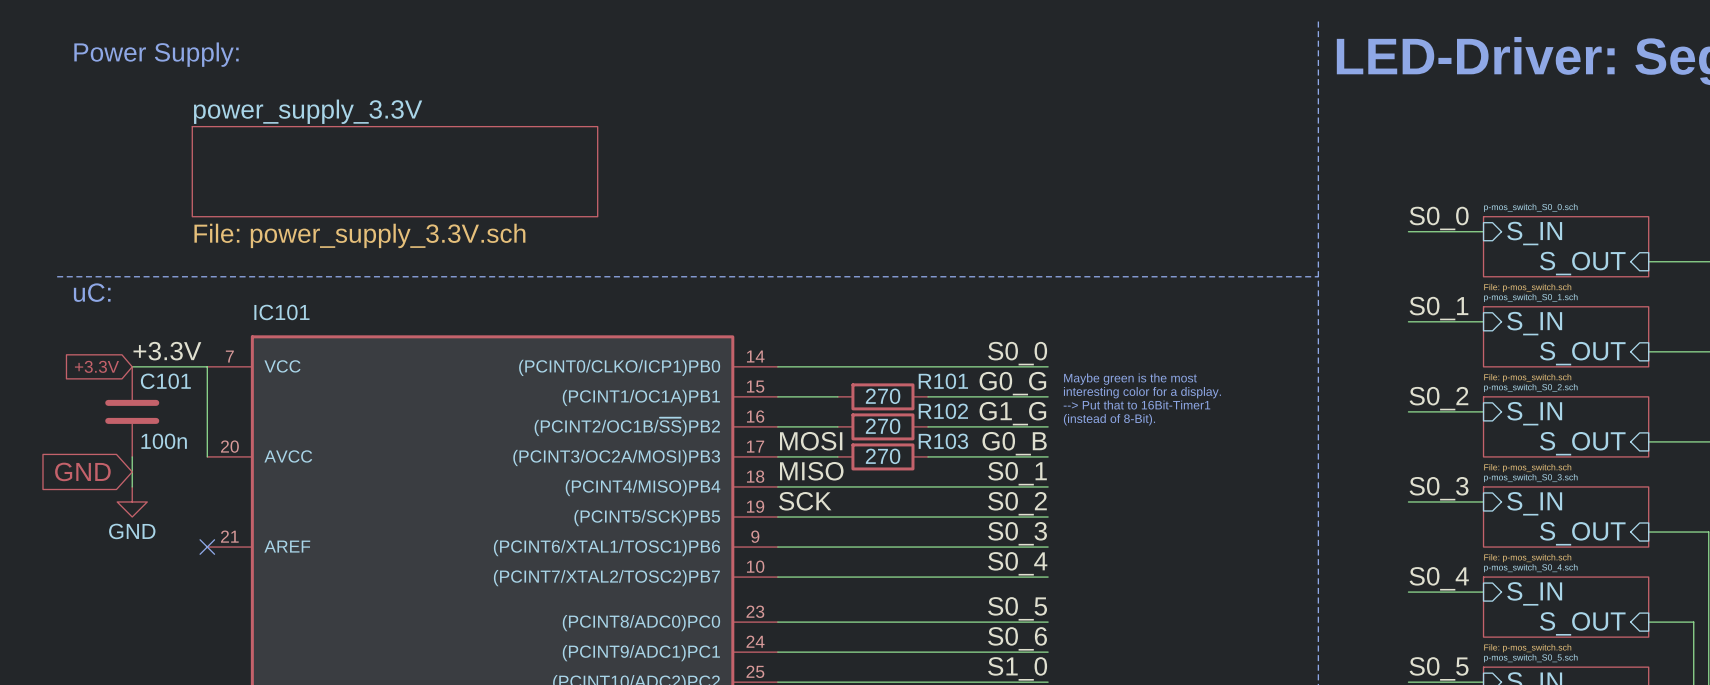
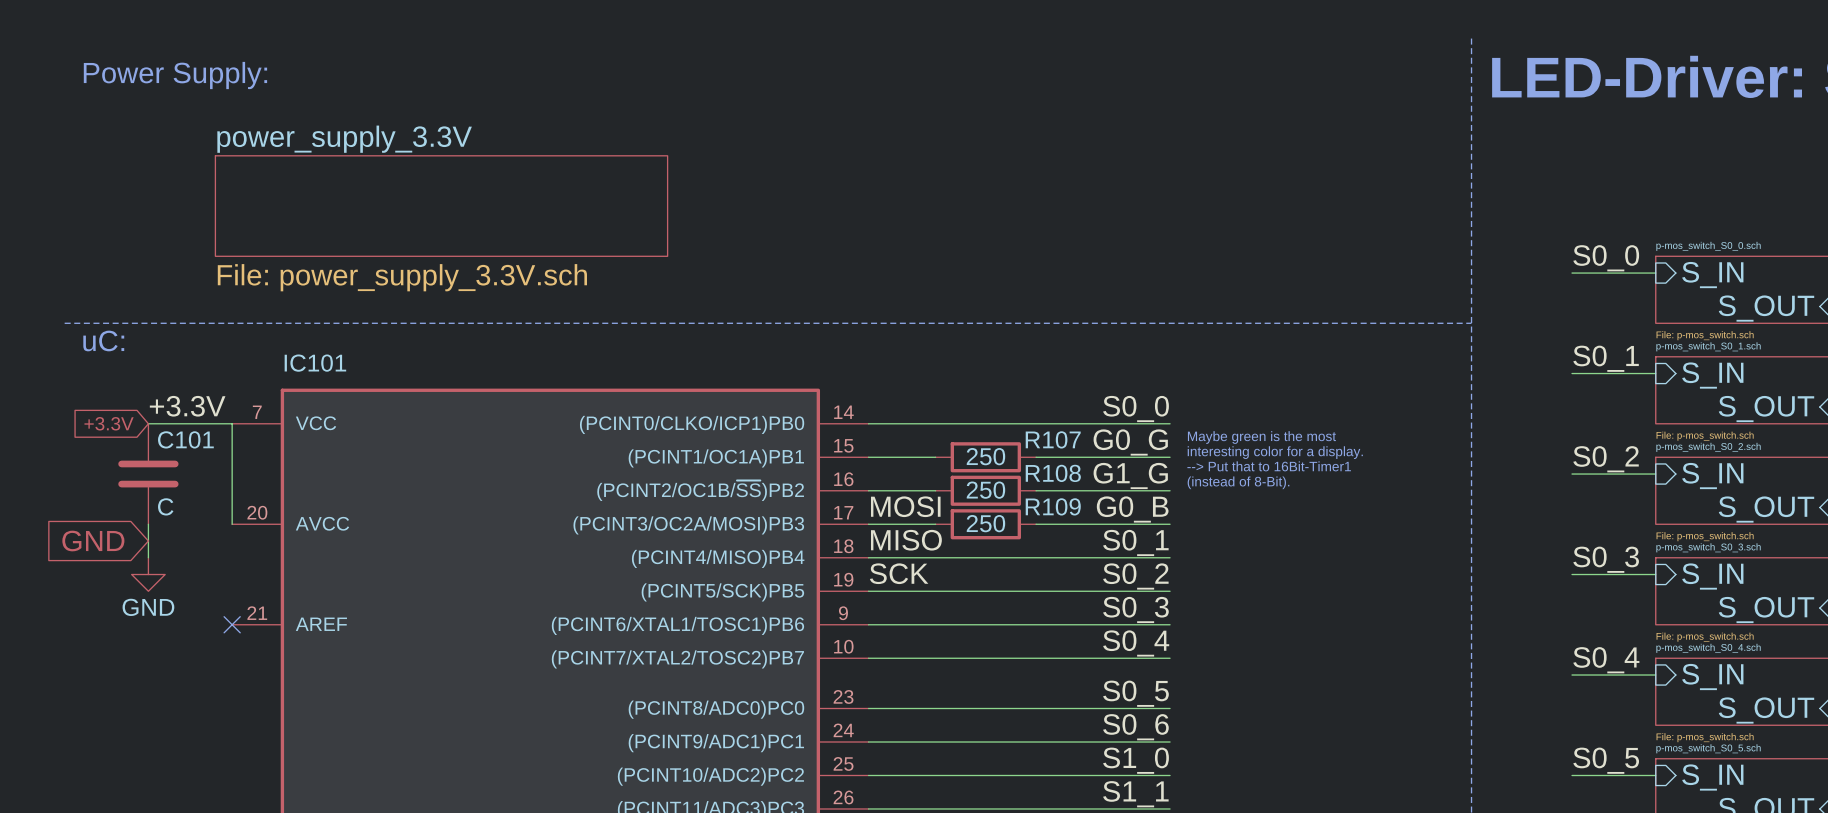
R101 name: R101 (943, 381) -> R107 (1053, 439)
R101 value: 270 (883, 396) -> 250 (985, 456)
R102 name: R102 (943, 411) -> R108 (1053, 473)
R102 value: 270 (883, 426) -> 250 (985, 490)
C101 value: 100n (164, 441) -> C (165, 506)
R103 name: R103 (943, 441) -> R109 (1053, 506)
R103 value: 270 (883, 456) -> 250 (985, 523)

